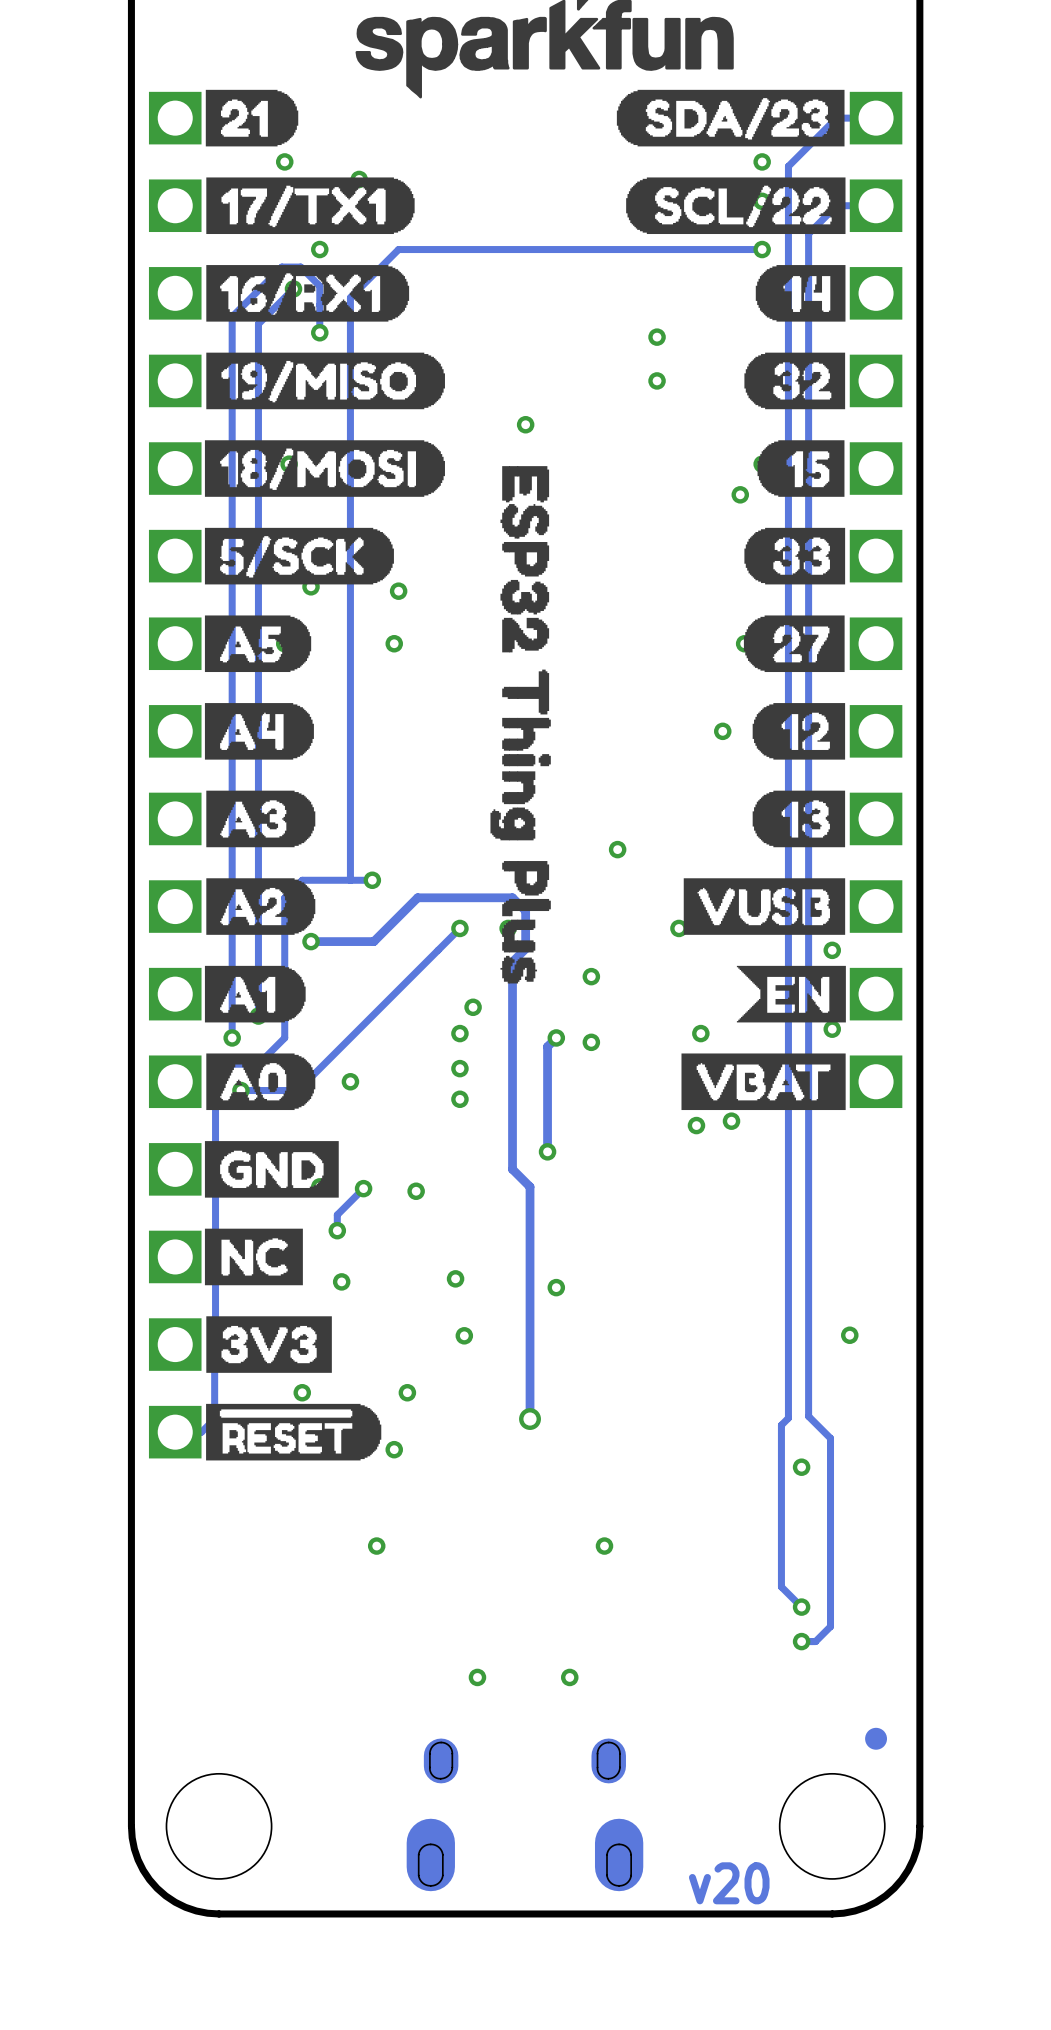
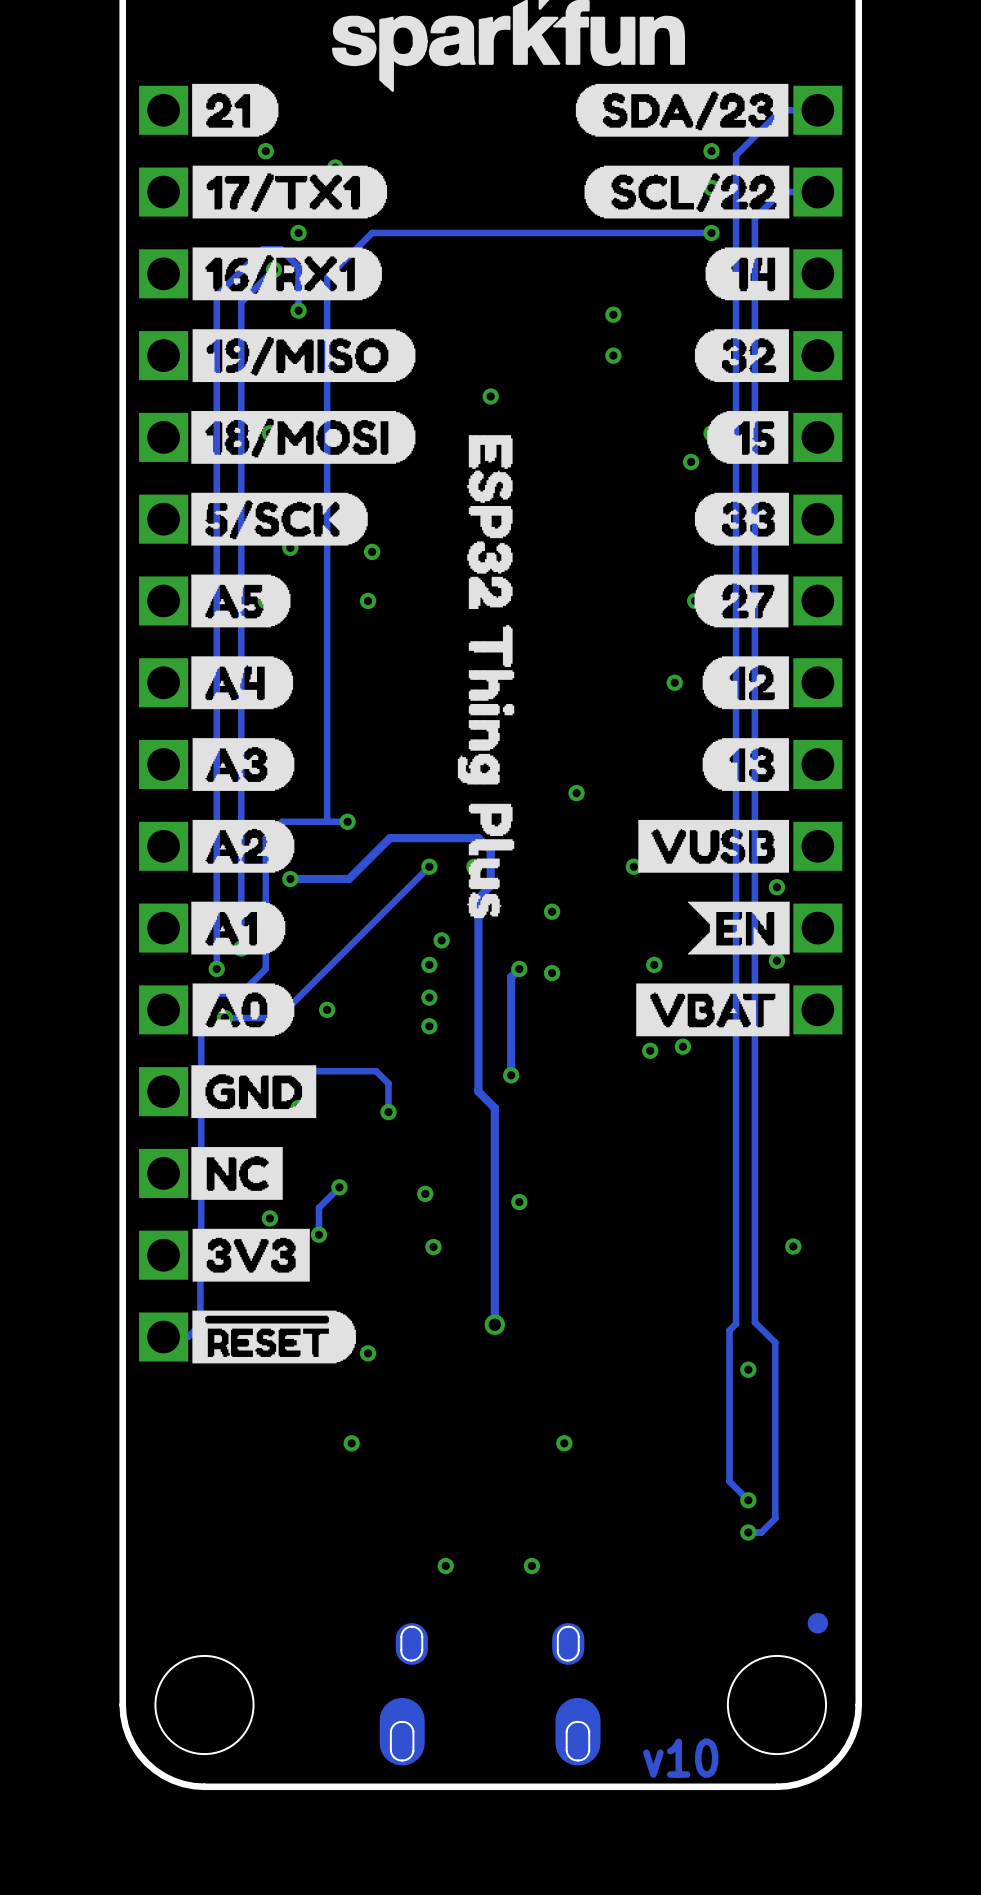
track: none -> (261, 1071) (376, 1071) (388, 1083) (388, 1112)
track: (363, 1188) (337, 1214) (337, 1230) -> none
via: (363, 1188) -> none
via: (337, 1230) -> none
track: none -> (339, 1187) (318, 1207) (318, 1234)
via: none -> (339, 1187)
via: (341, 1281) -> none
via: none -> (269, 1218)
via: none -> (318, 1234)
via: (302, 1392) -> none
via: (407, 1392) -> none
text: v20 (729, 1883) -> v10 (680, 1758)

